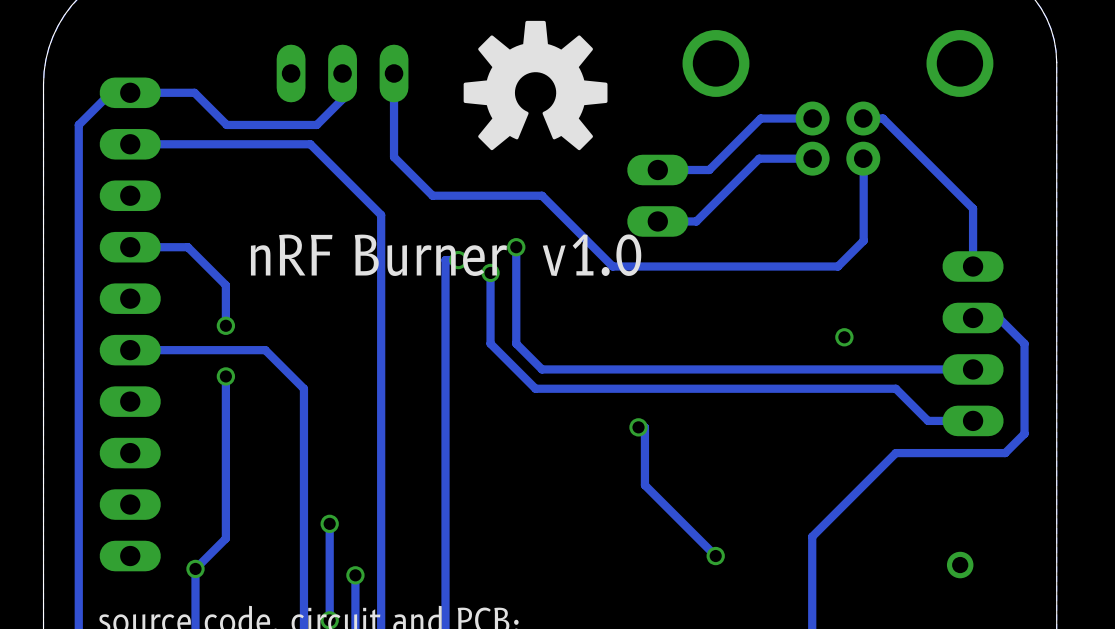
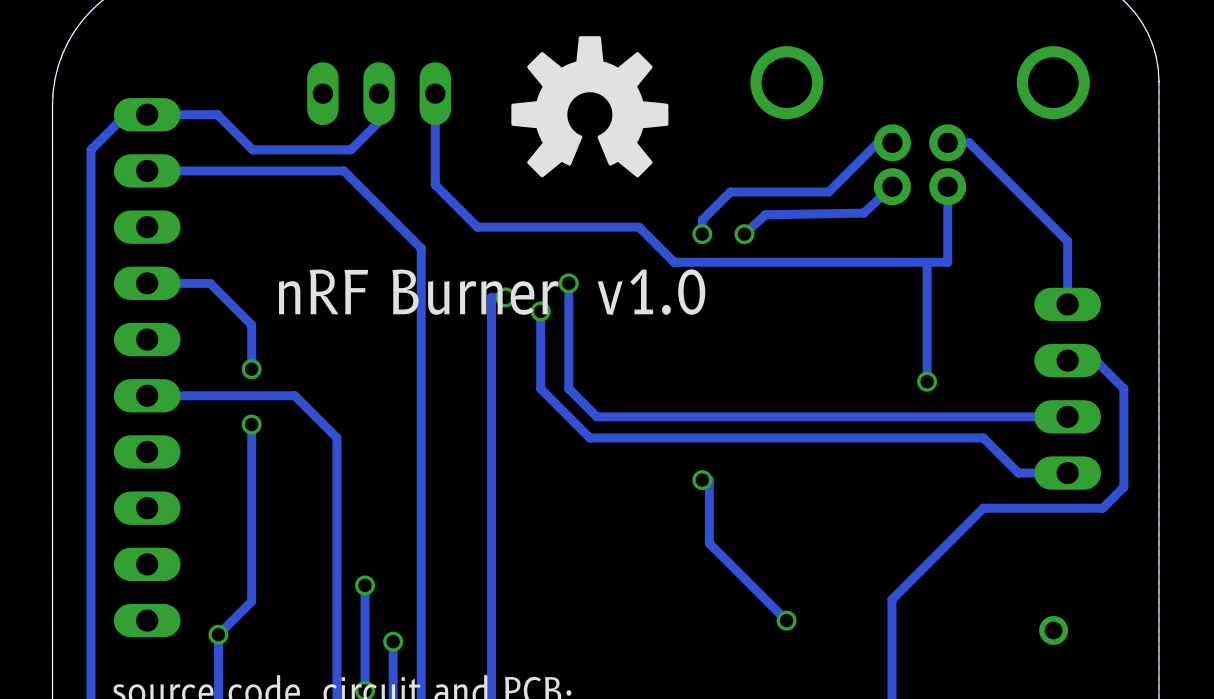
track: (799, 118) (760, 118) (709, 170) (657, 170) -> none
track: (812, 158) (759, 158) -> (877, 142) (834, 186)
track: none -> (892, 186) (863, 213) (765, 214) (744, 234)
track: (863, 158) (863, 240) (837, 266) (612, 266) (542, 195) -> (947, 186) (947, 262) (674, 262) (639, 227) (596, 227)
track: (754, 163) (696, 221) (657, 221) -> (828, 192) (730, 192) (702, 220) (702, 234)
part: (657, 195) -> none
via: none -> (702, 234)
via: none -> (744, 234)
track: none -> (927, 262) (927, 381)

